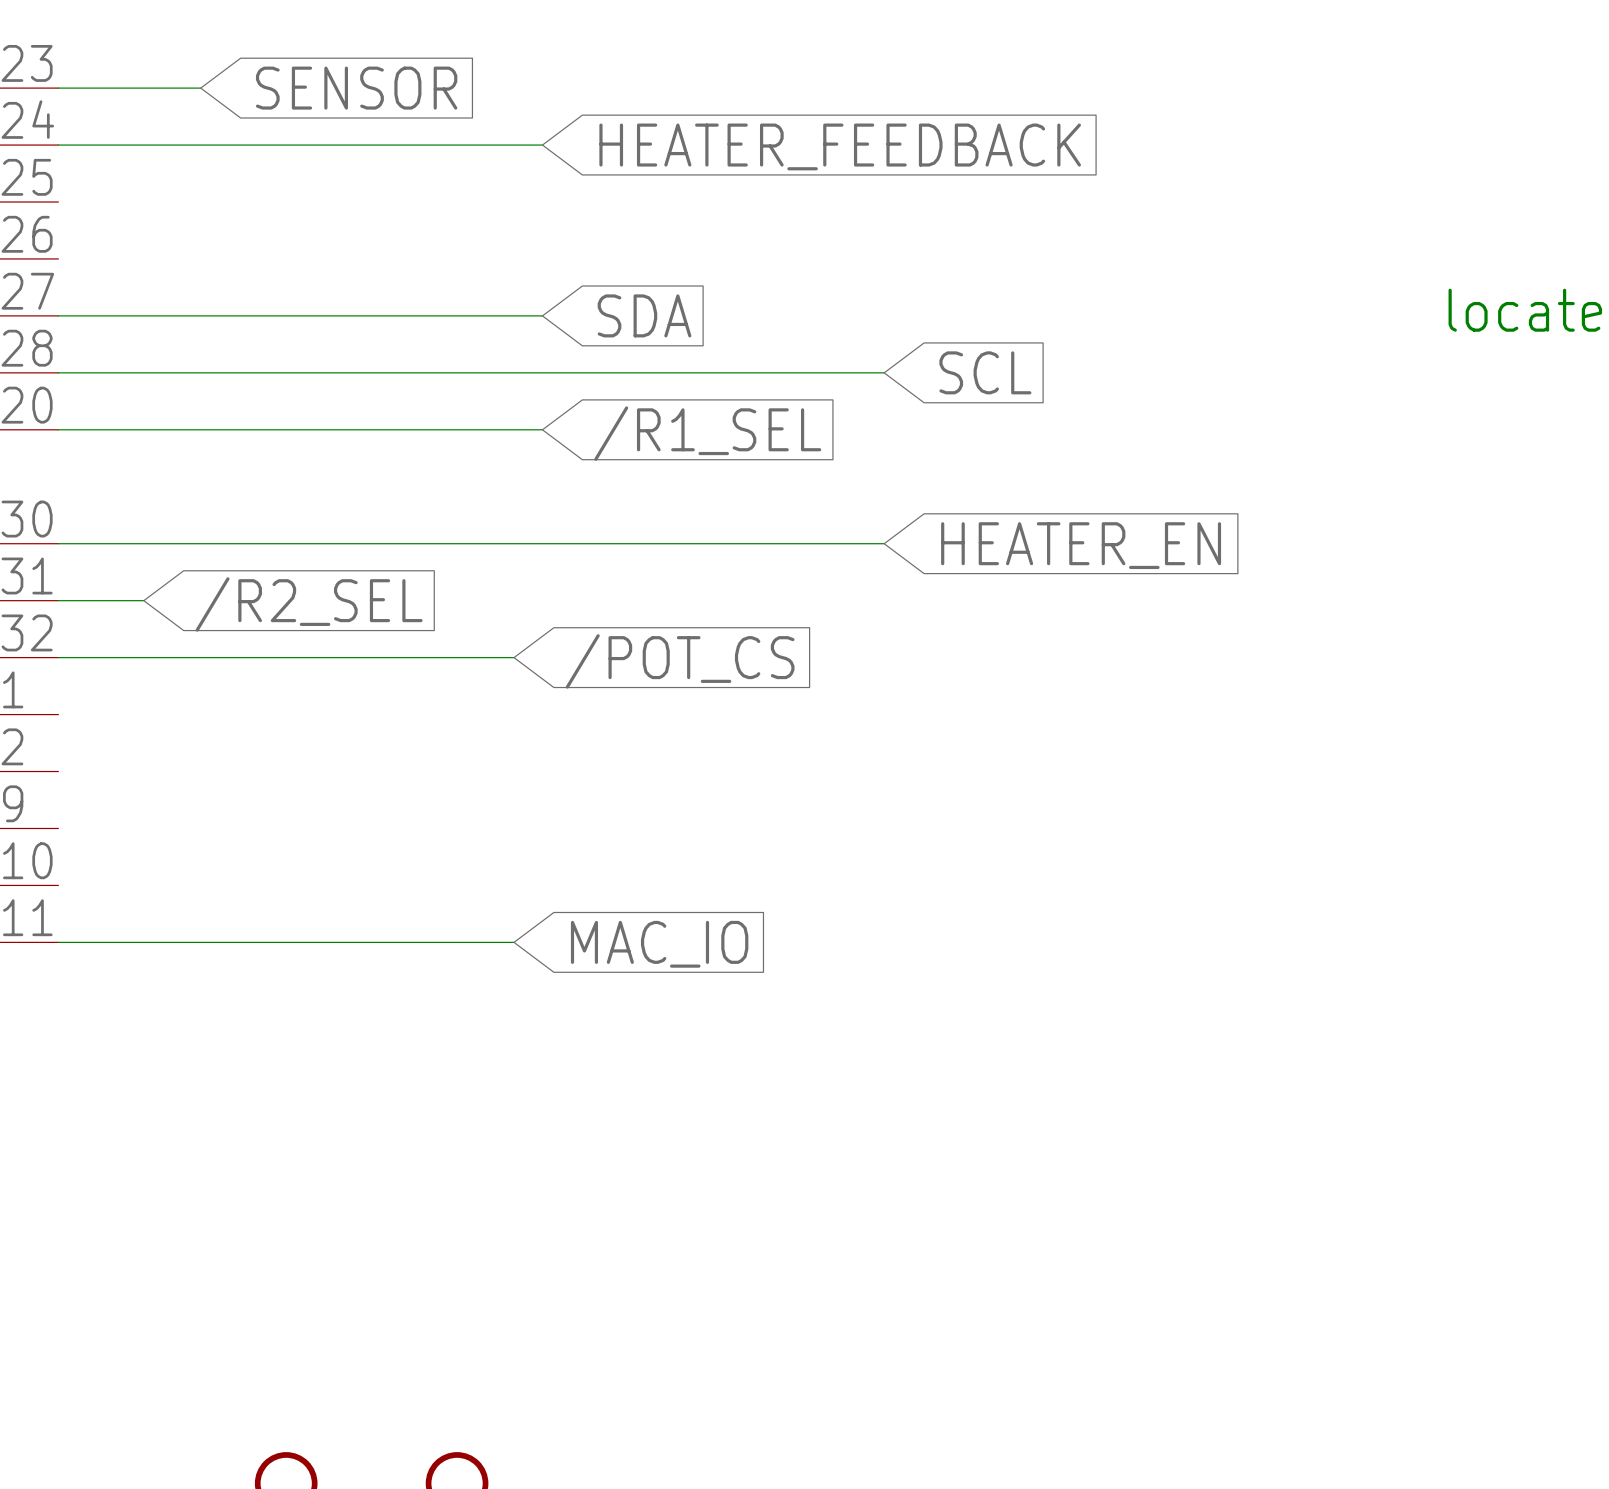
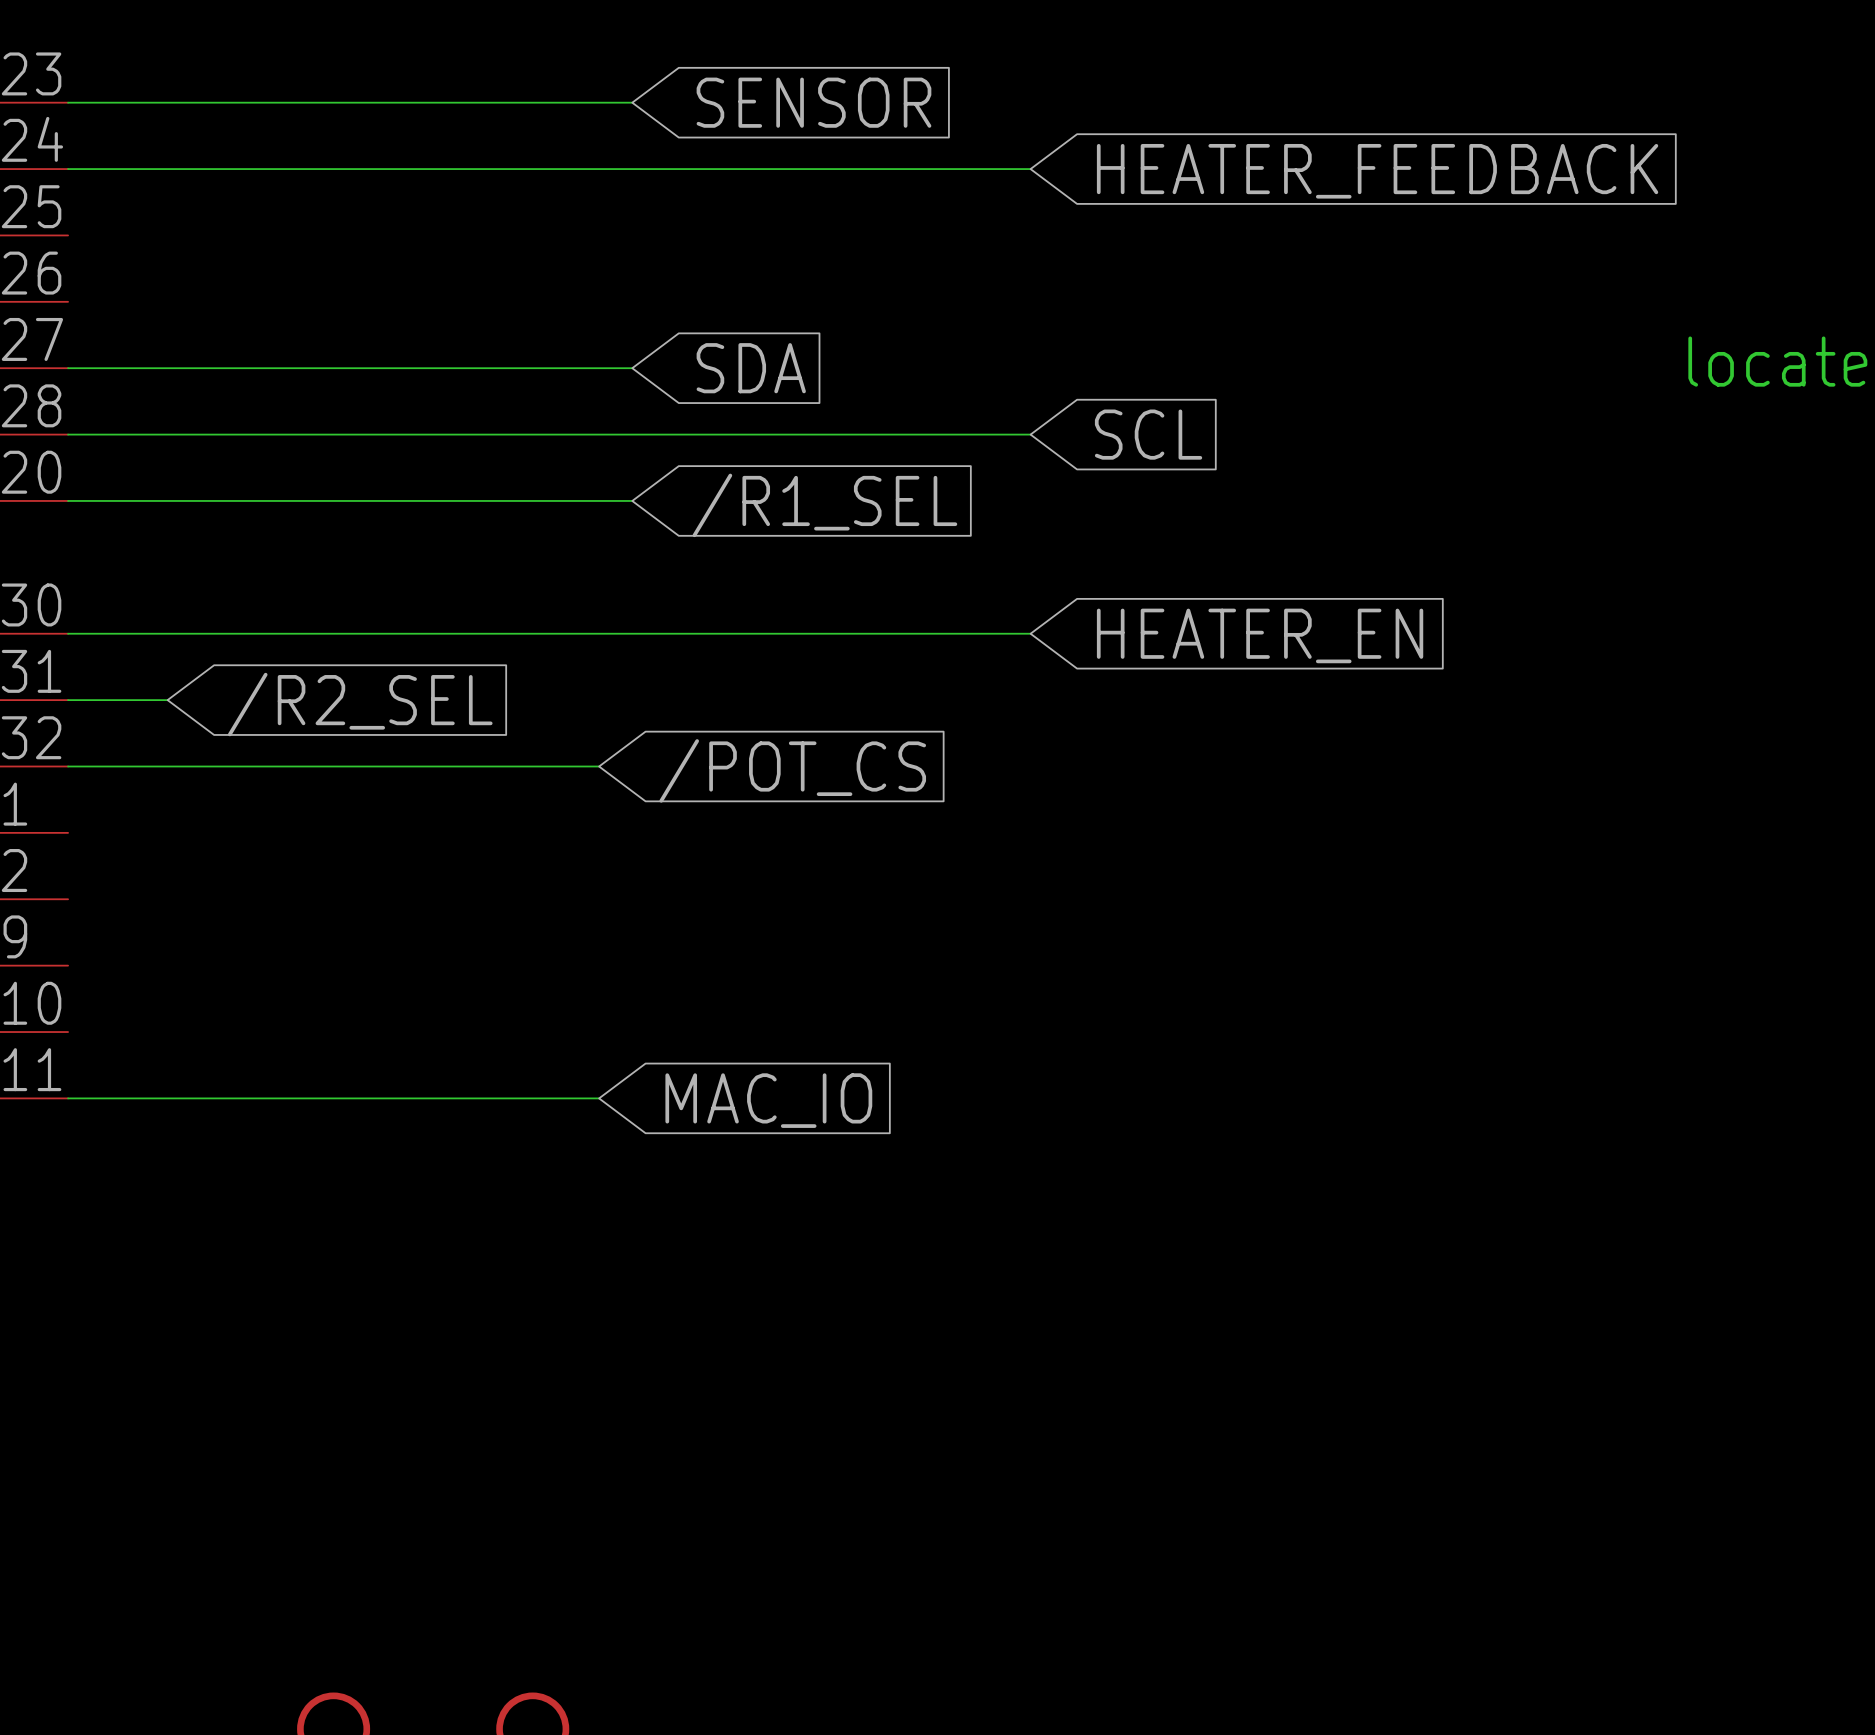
wire: none -> (234, 102) (632, 102)
global label position: SENSOR (356, 88) -> SENSOR (813, 102)
wire: none -> (632, 169) (1030, 169)
global label position: HEATER_FEEDBACK (840, 146) -> HEATER_FEEDBACK (1377, 171)

